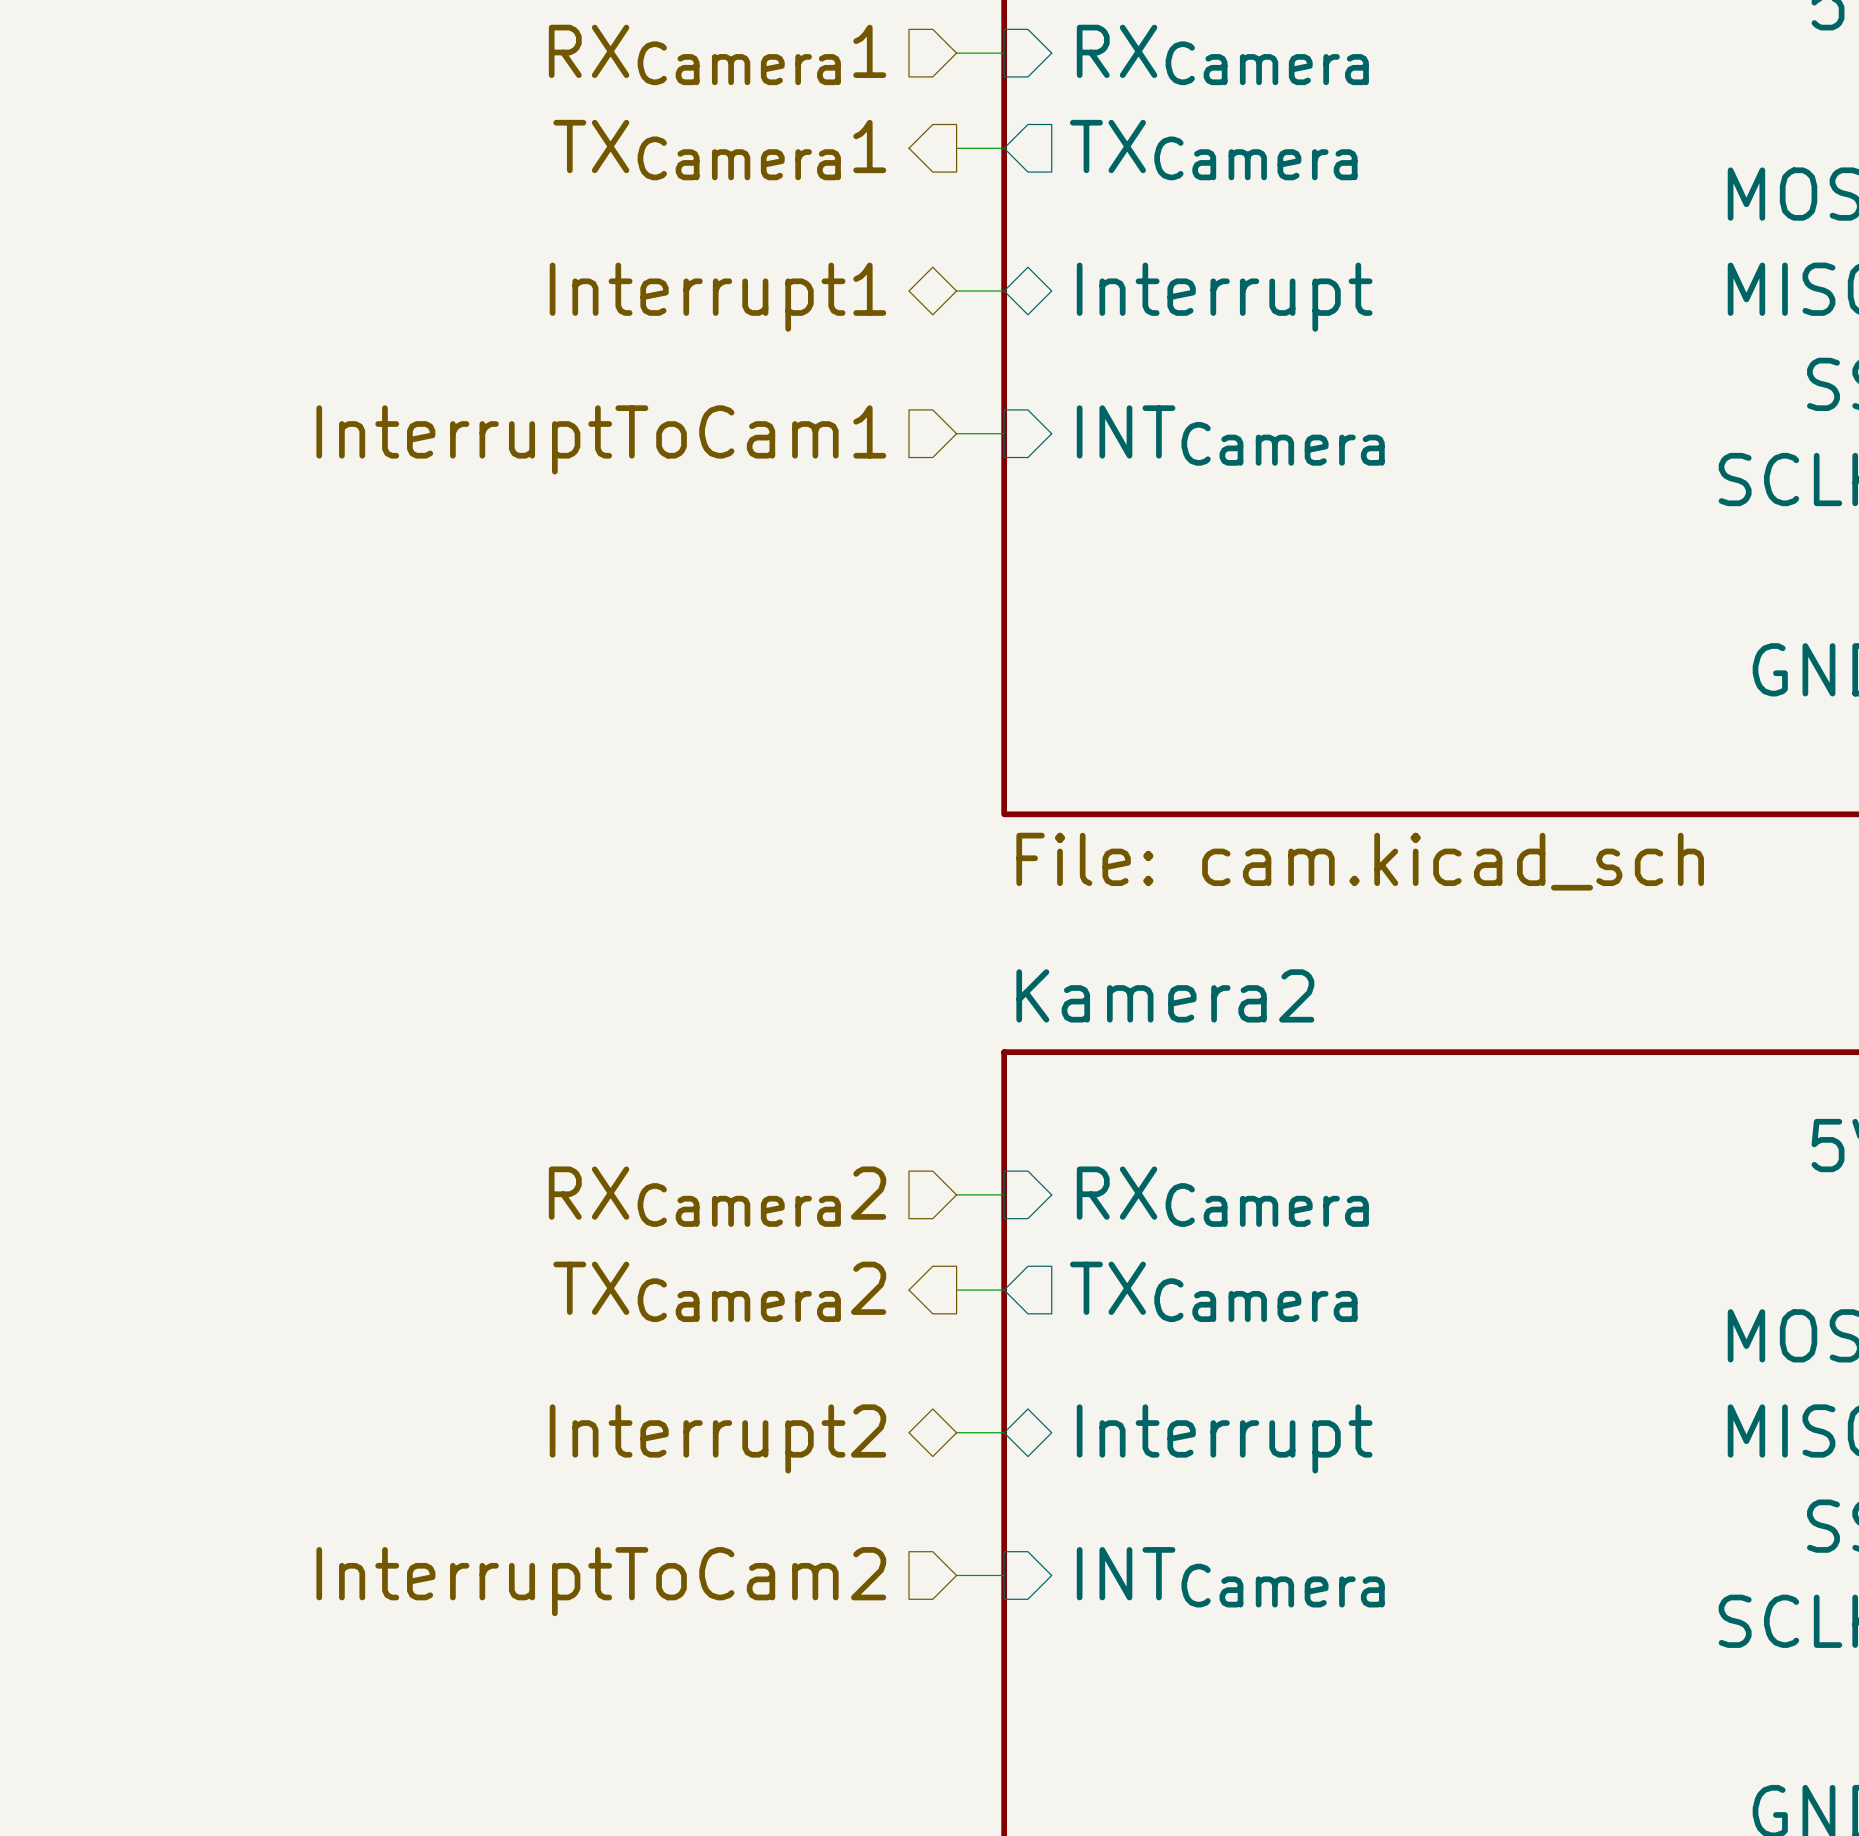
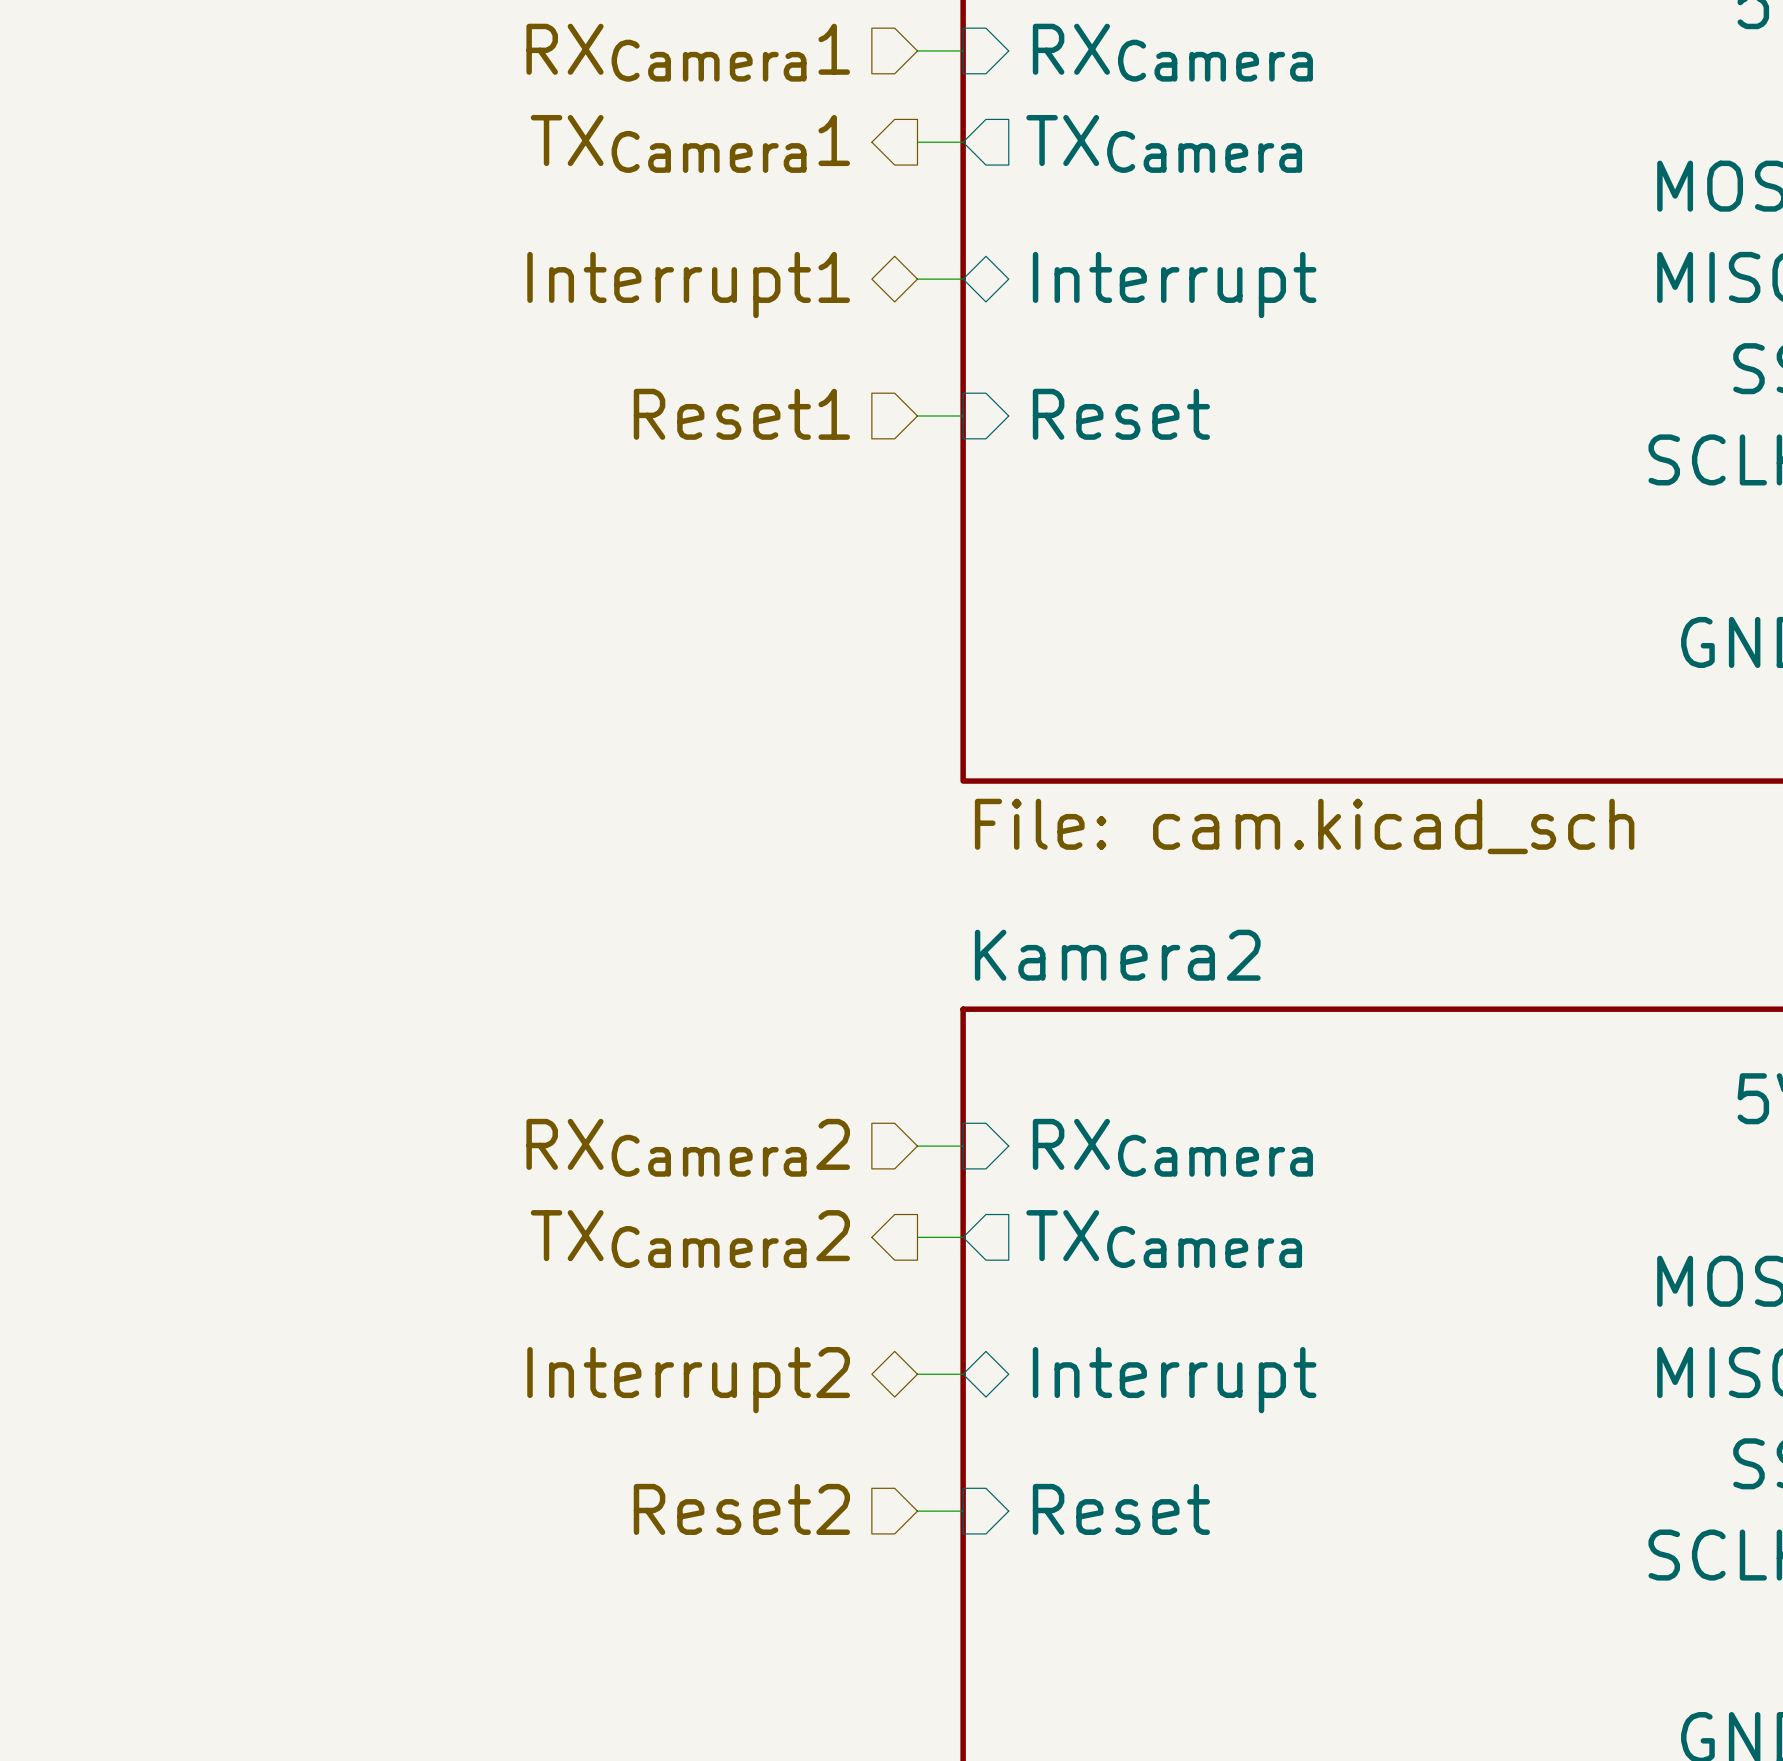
sheet pin: INTCamera (1230, 435) -> Reset (1121, 414)
hierarchical label: InterruptToCam1 (601, 439) -> Reset1 (741, 414)
sheet pin: INTCamera (1230, 1577) -> Reset (1121, 1509)
hierarchical label: InterruptToCam2 (601, 1581) -> Reset2 (741, 1509)

